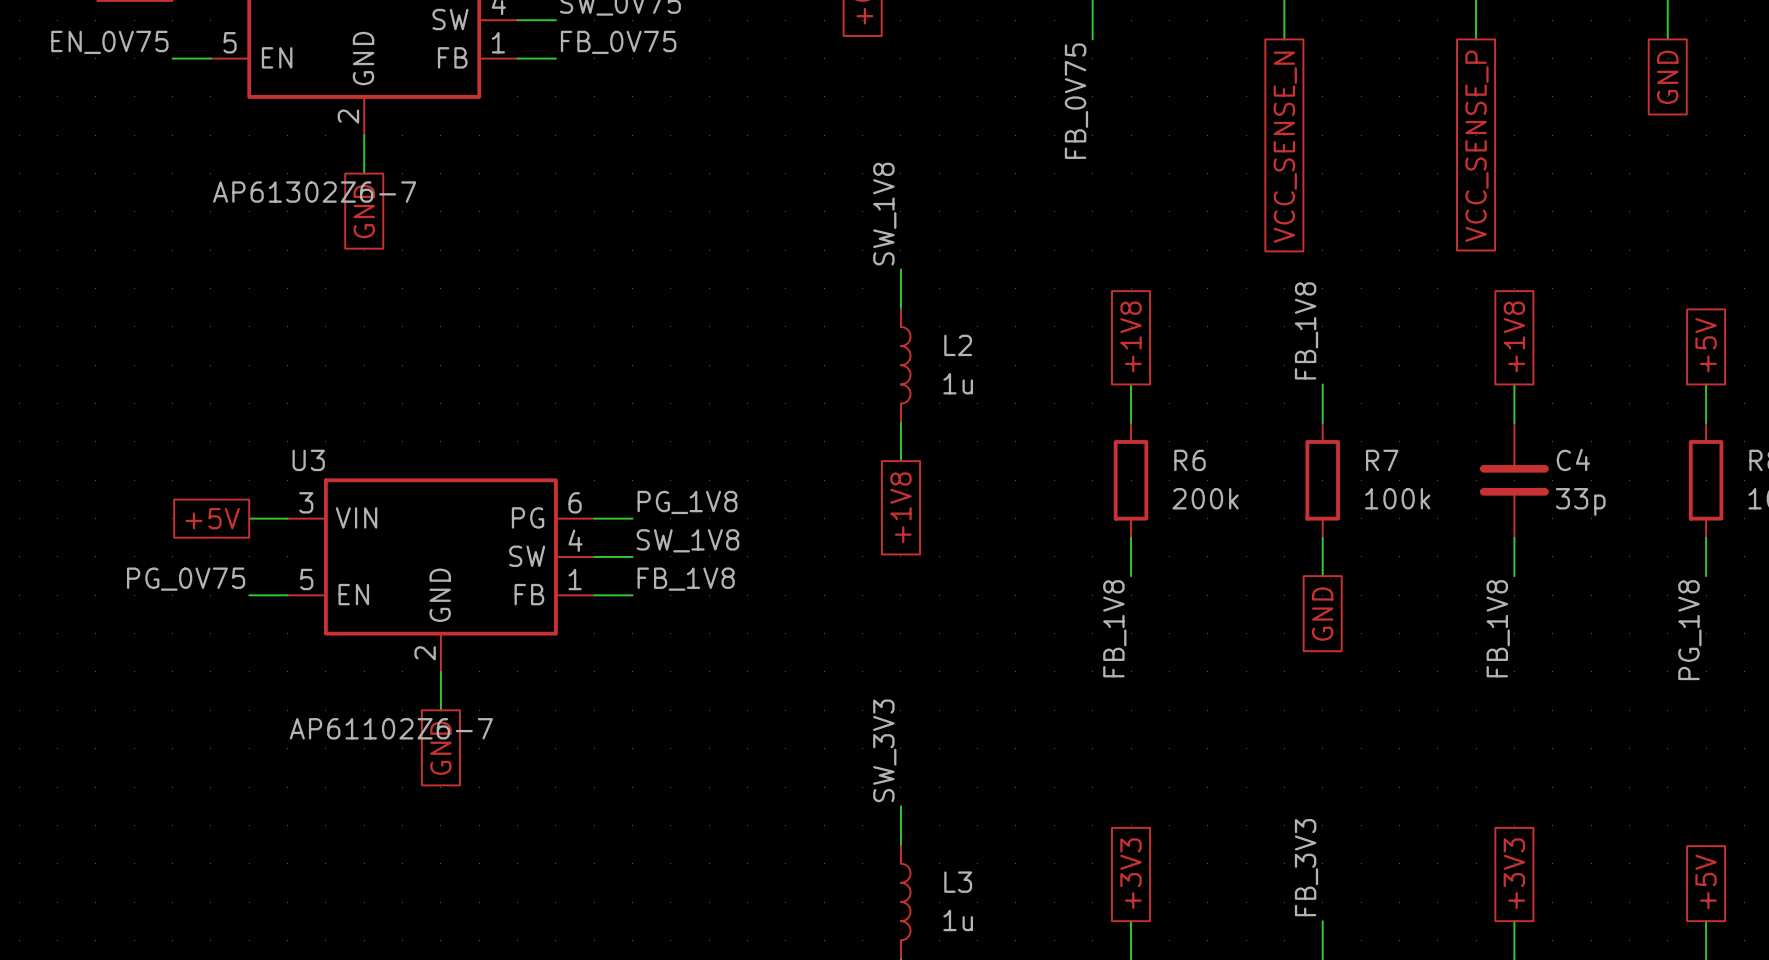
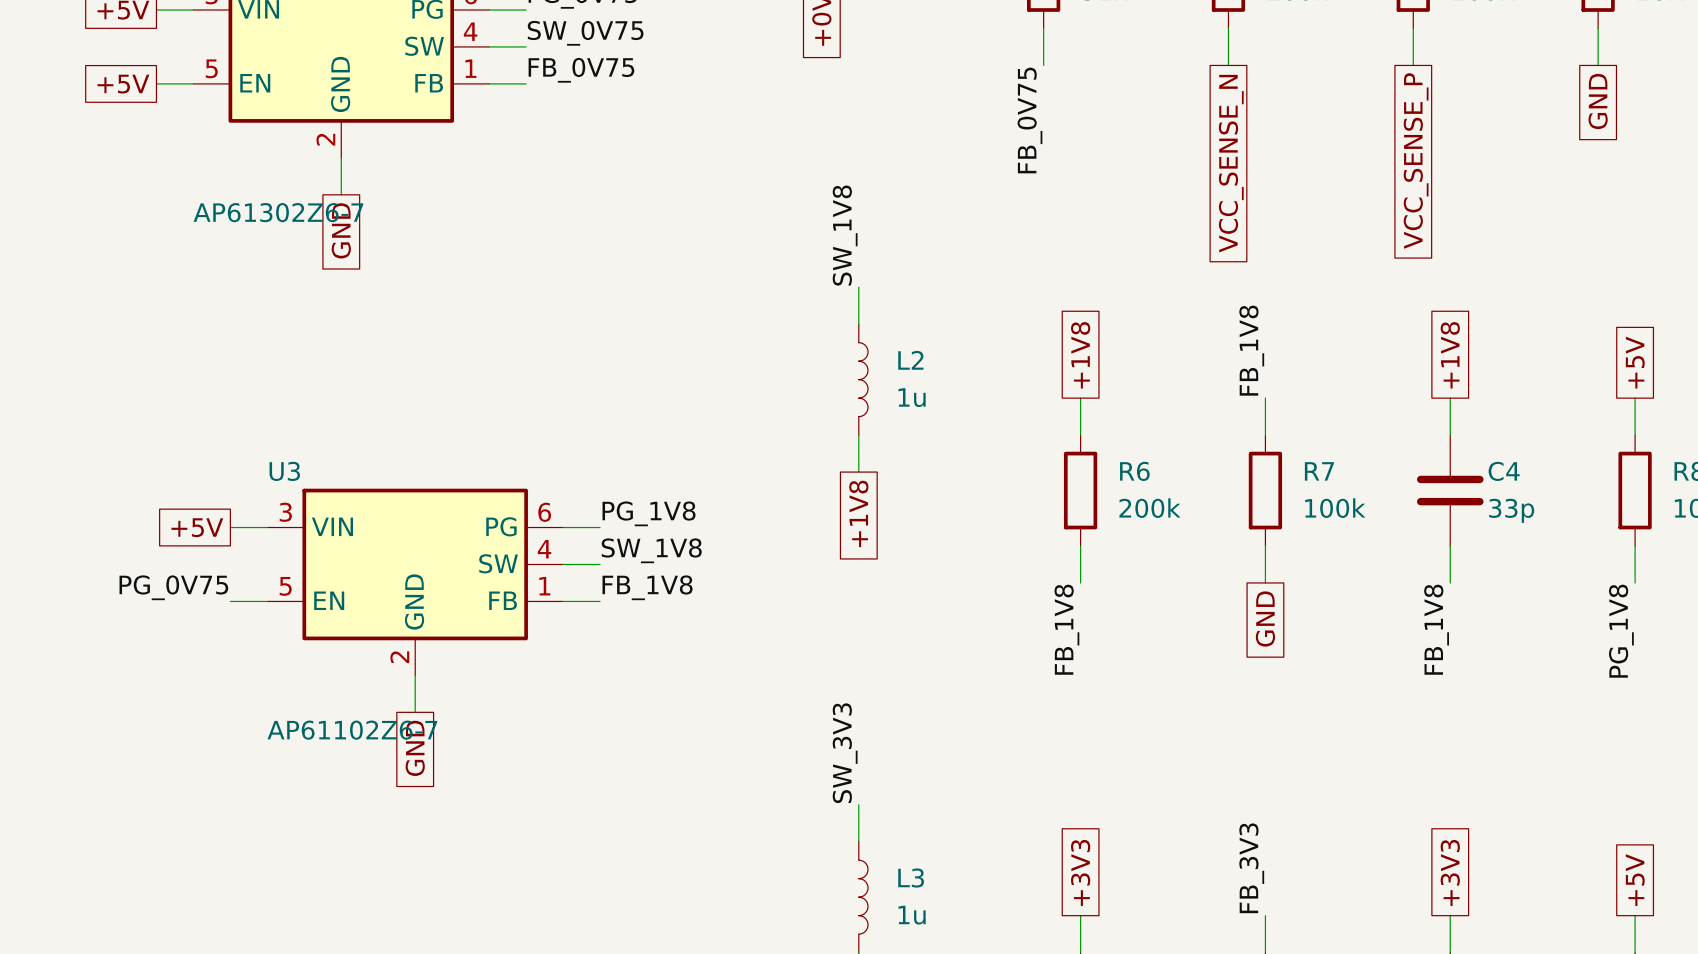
label: EN_0V75 (109, 42) -> none
global label: none -> +5V (123, 84)

